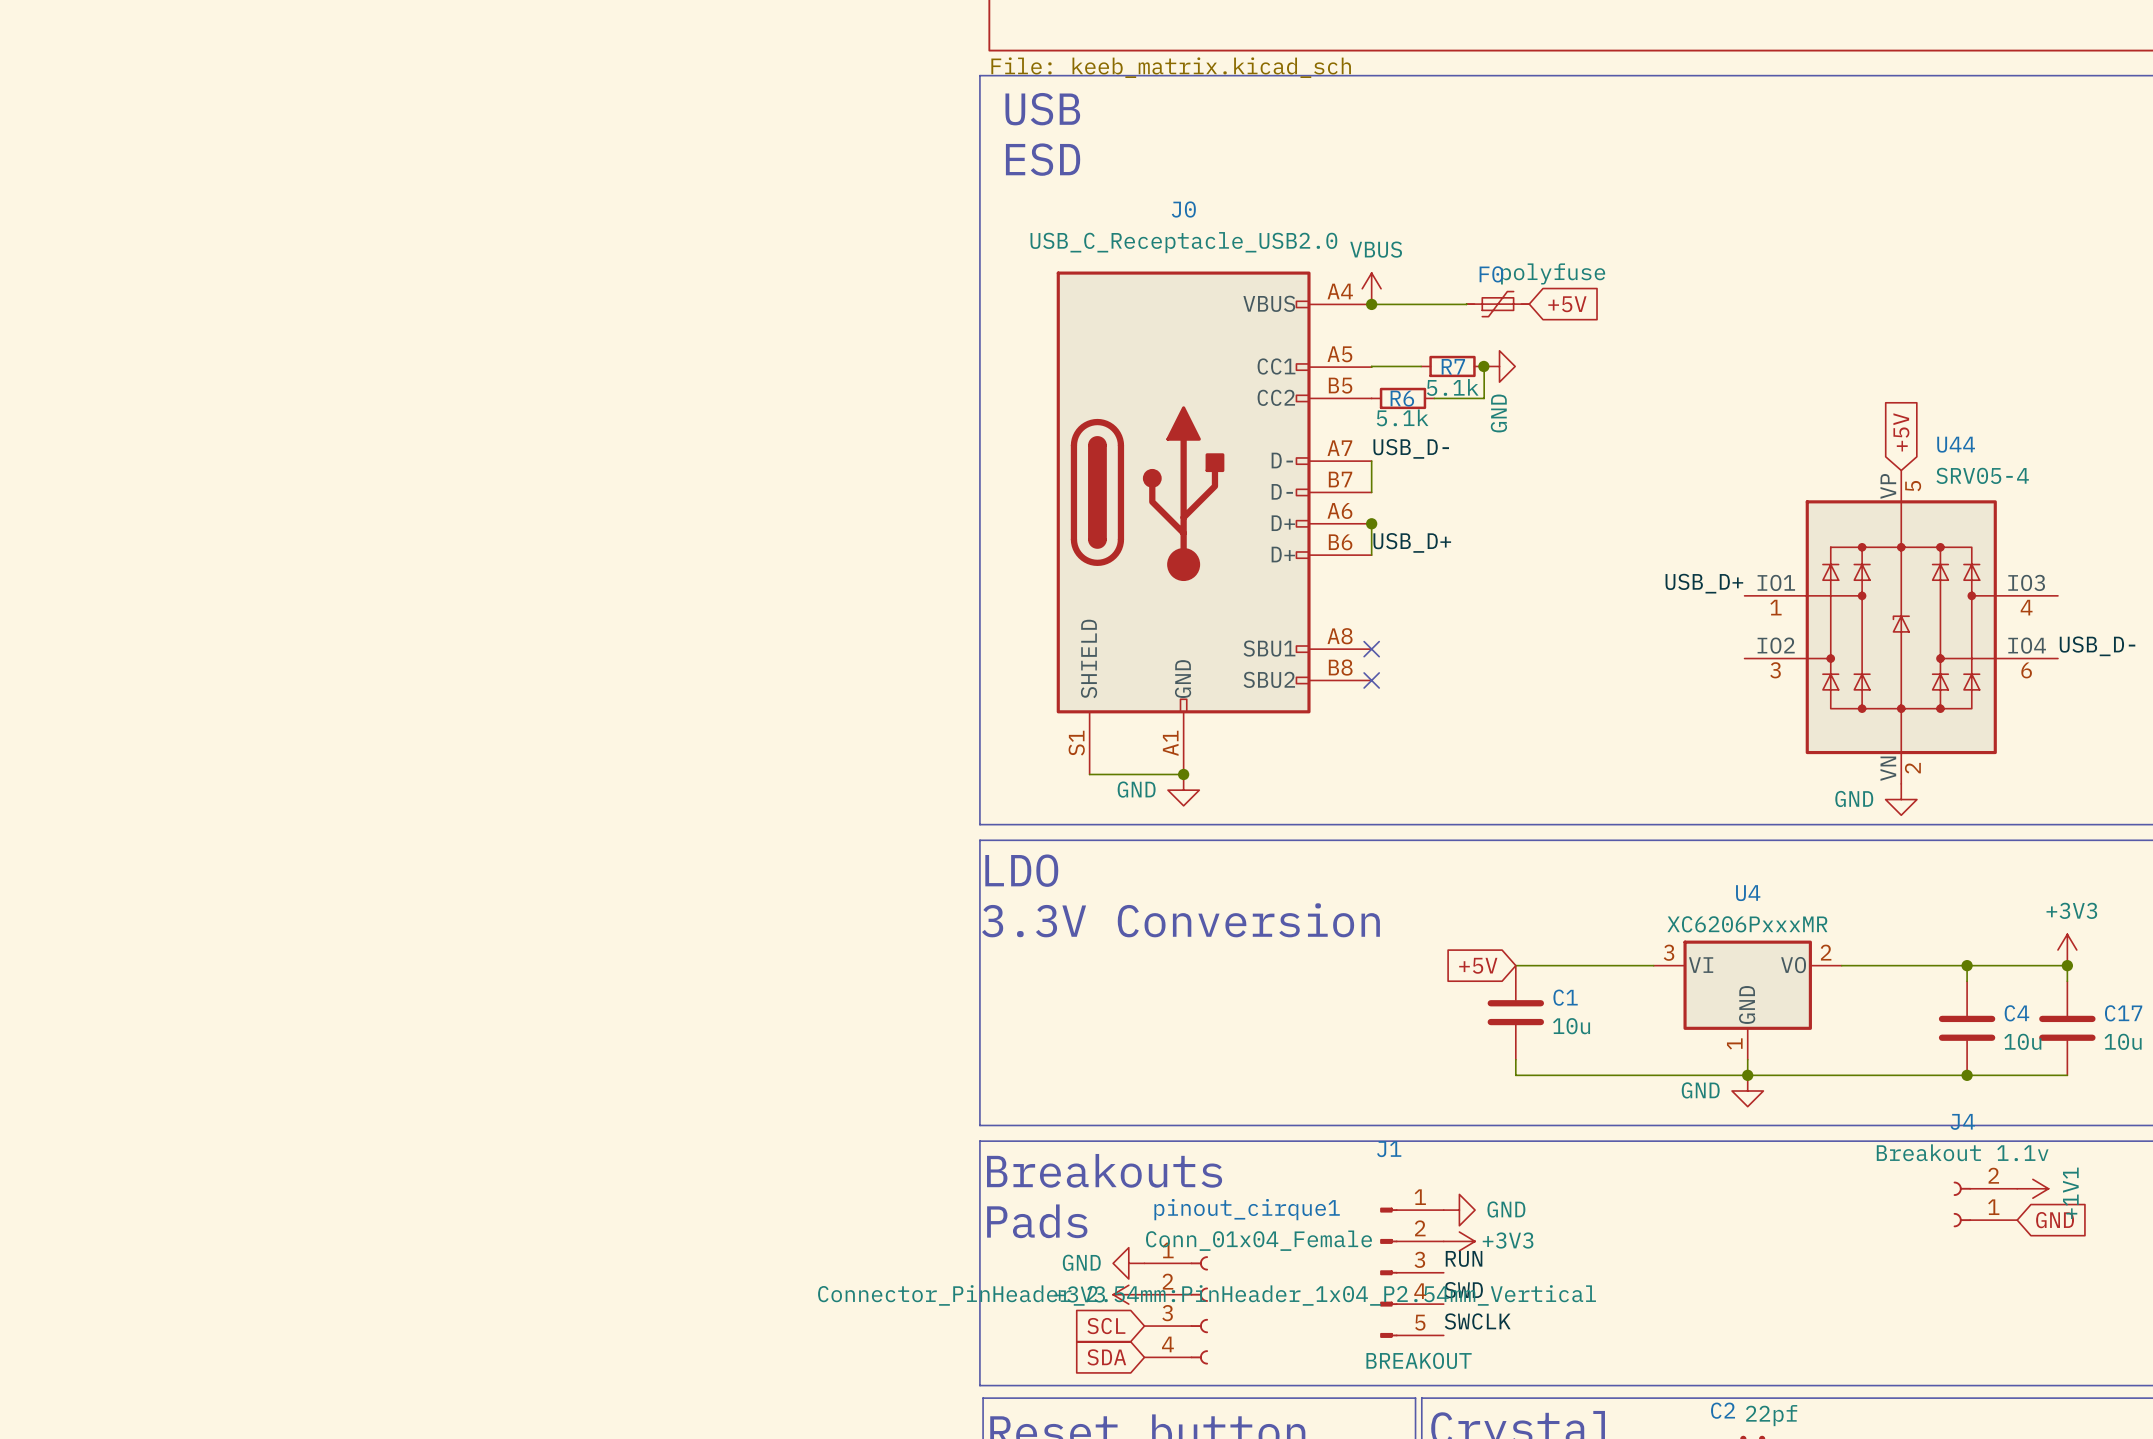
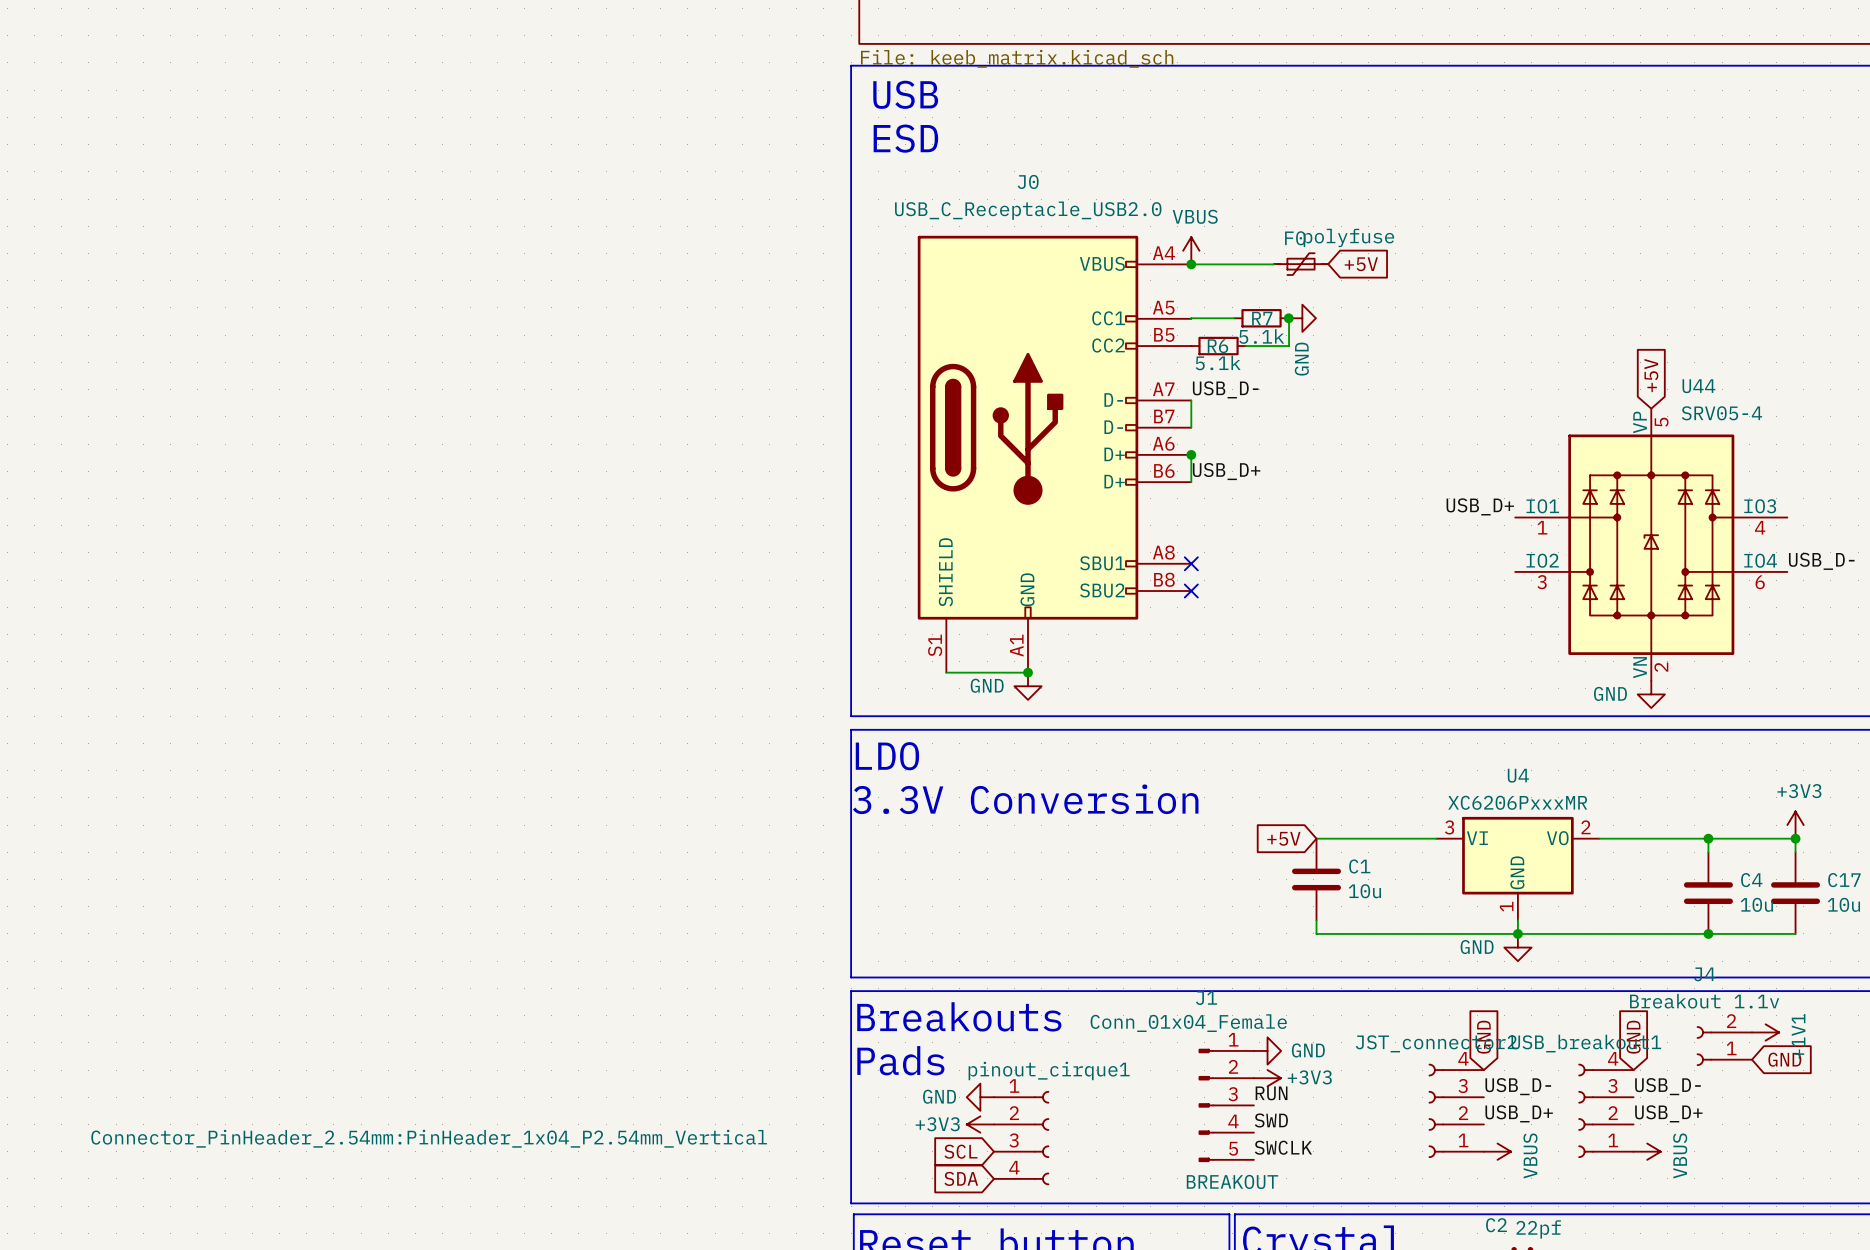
global label: none -> GND (1483, 1037)
global label: none -> GND (1633, 1037)
pinout_cirque1 name position: pinout_cirque1 (1247, 1209) -> pinout_cirque1 (1049, 1070)
pinout_cirque1 value position: Conn_01x04_Female (1258, 1240) -> Conn_01x04_Female (1188, 1023)
label: none -> USB_D- (1518, 1086)
label: none -> USB_D- (1667, 1086)
JST_connector2: none -> (1456, 1110)
USB_breakout1: none -> (1605, 1110)
label: none -> USB_D+ (1519, 1113)
label: none -> USB_D+ (1668, 1113)
pinout_cirque1 text position: Connector_PinHeader_2.54mm:PinHeader_1x04_P2.54mm_Vertical (1207, 1295) -> Connector_PinHeader_2.54mm:PinHeader_1x04_P2.54mm_Vertical (429, 1138)
power symbol: none -> VBUS (1497, 1151)
power symbol: none -> VBUS (1647, 1151)

